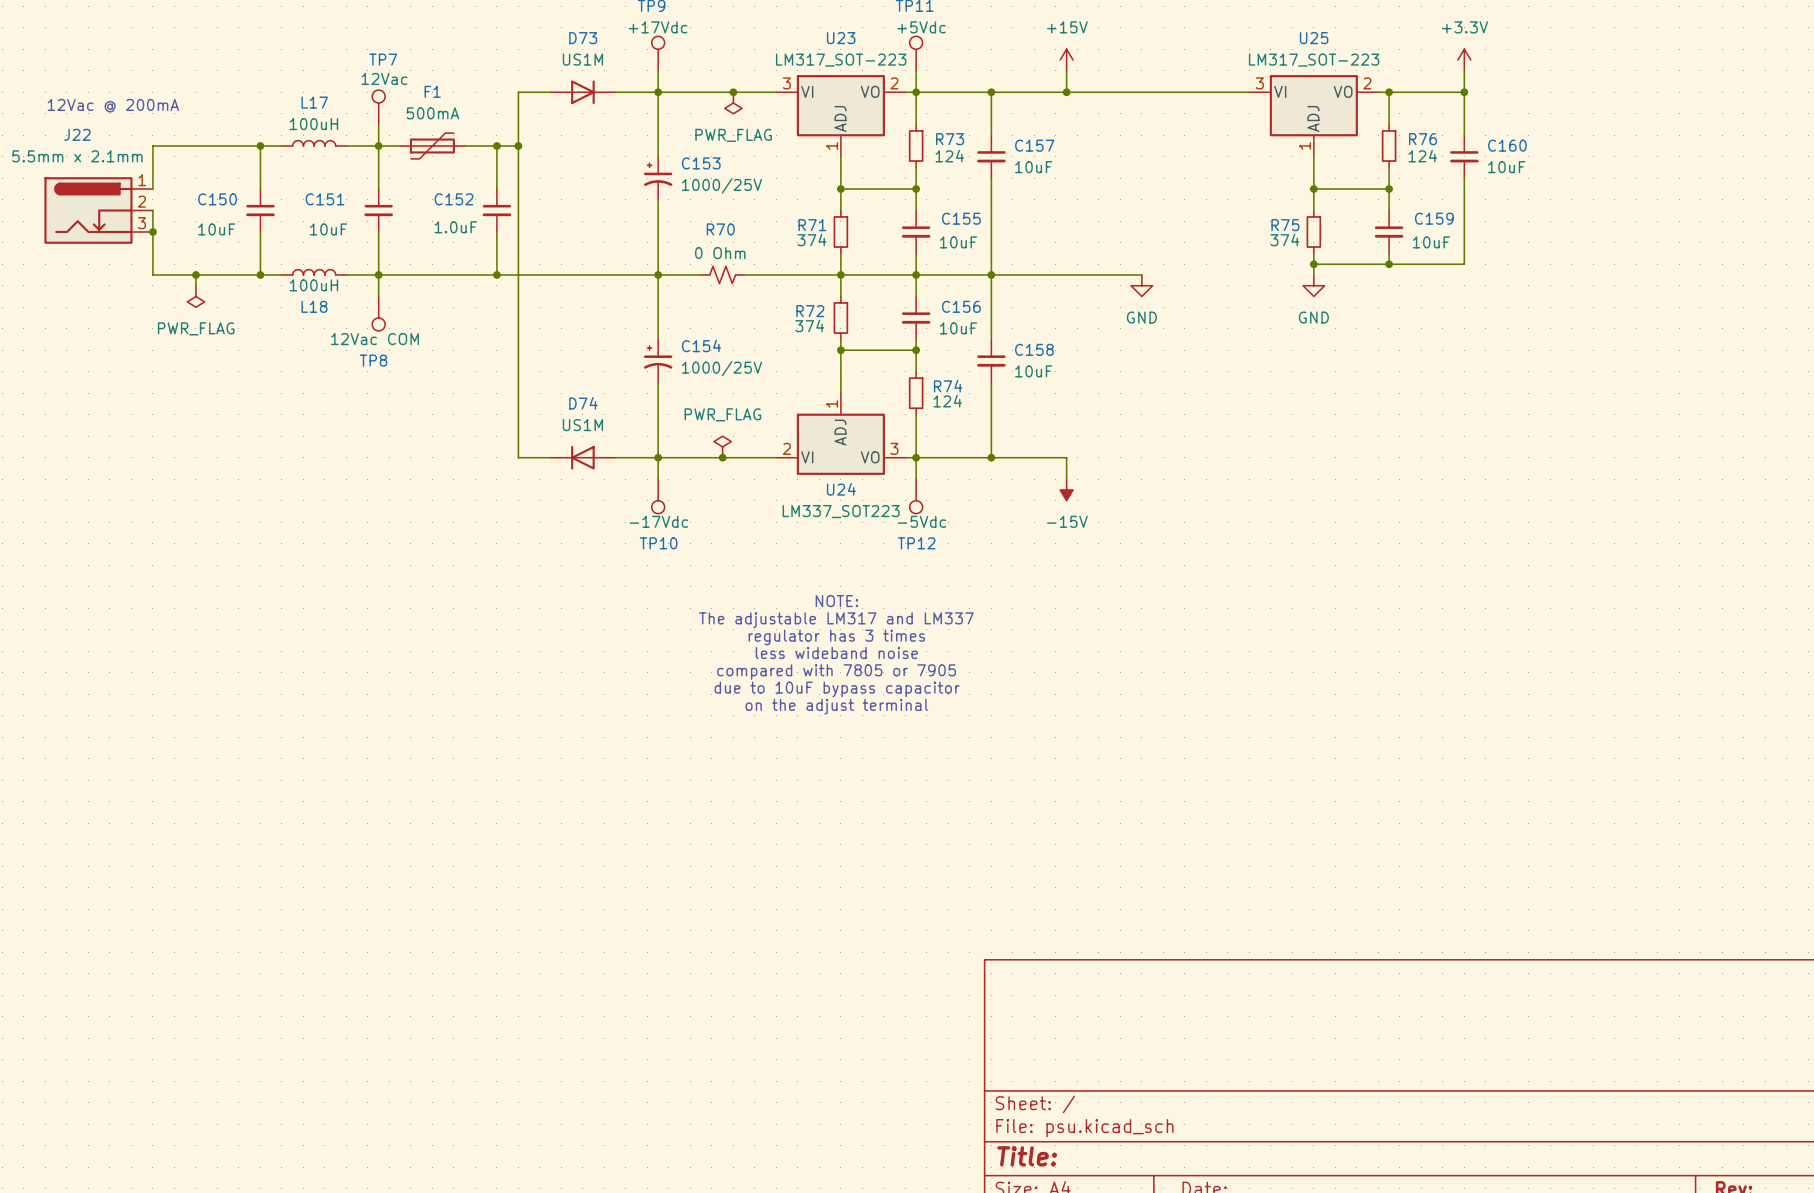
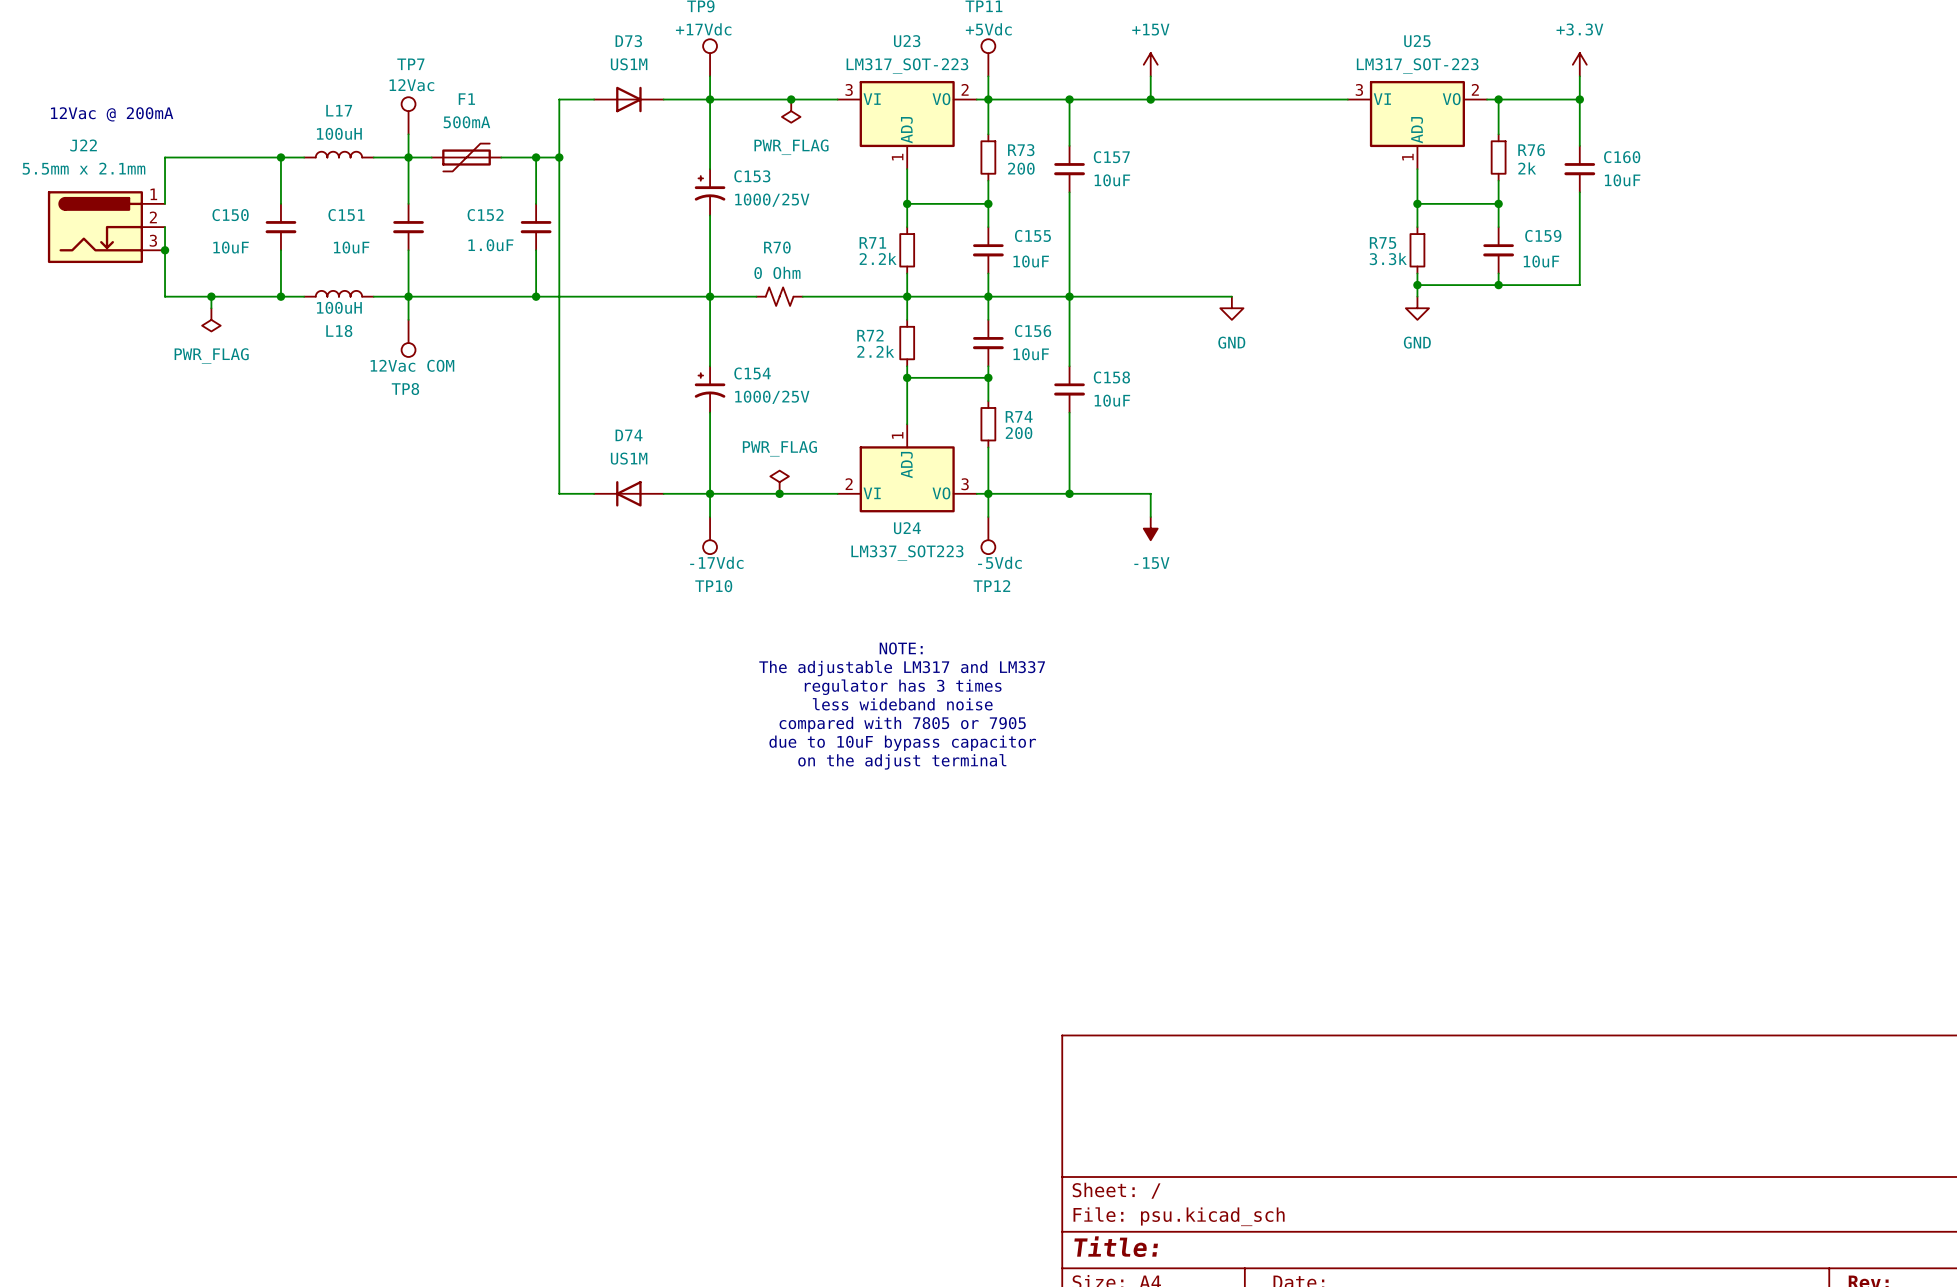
R73 value: 124 (949, 156) -> 200 (1021, 168)
R76 value: 124 (1422, 156) -> 2k (1527, 168)
R71 value: 374 (811, 239) -> 2.2k (878, 258)
R75 value: 374 (1284, 239) -> 3.3k (1388, 259)
R72 value: 374 (809, 325) -> 2.2k (875, 351)
R74 value: 124 (947, 401) -> 200 (1019, 433)

